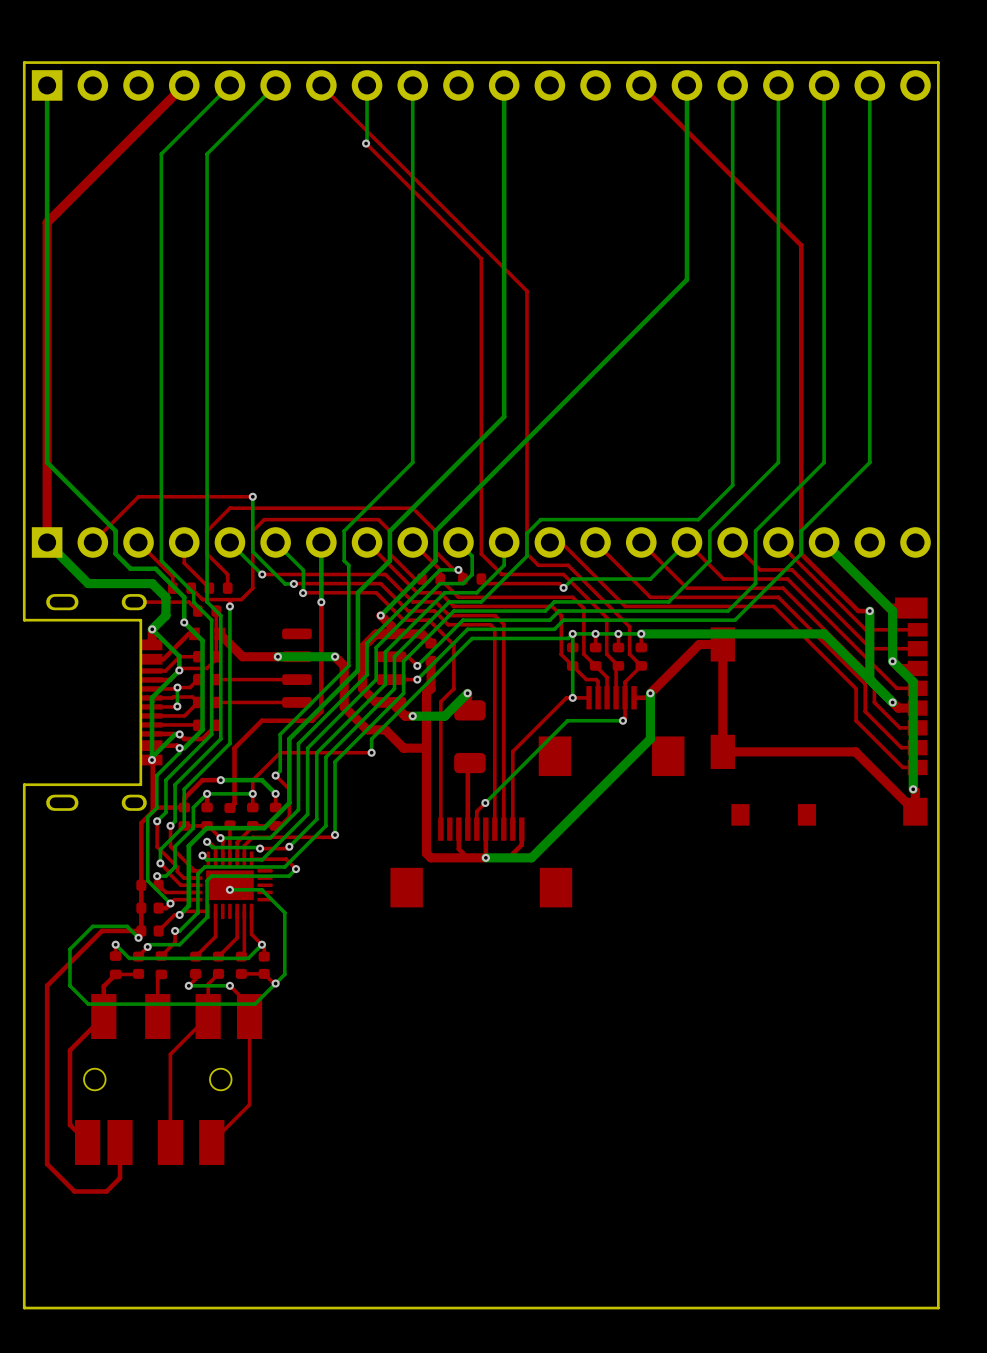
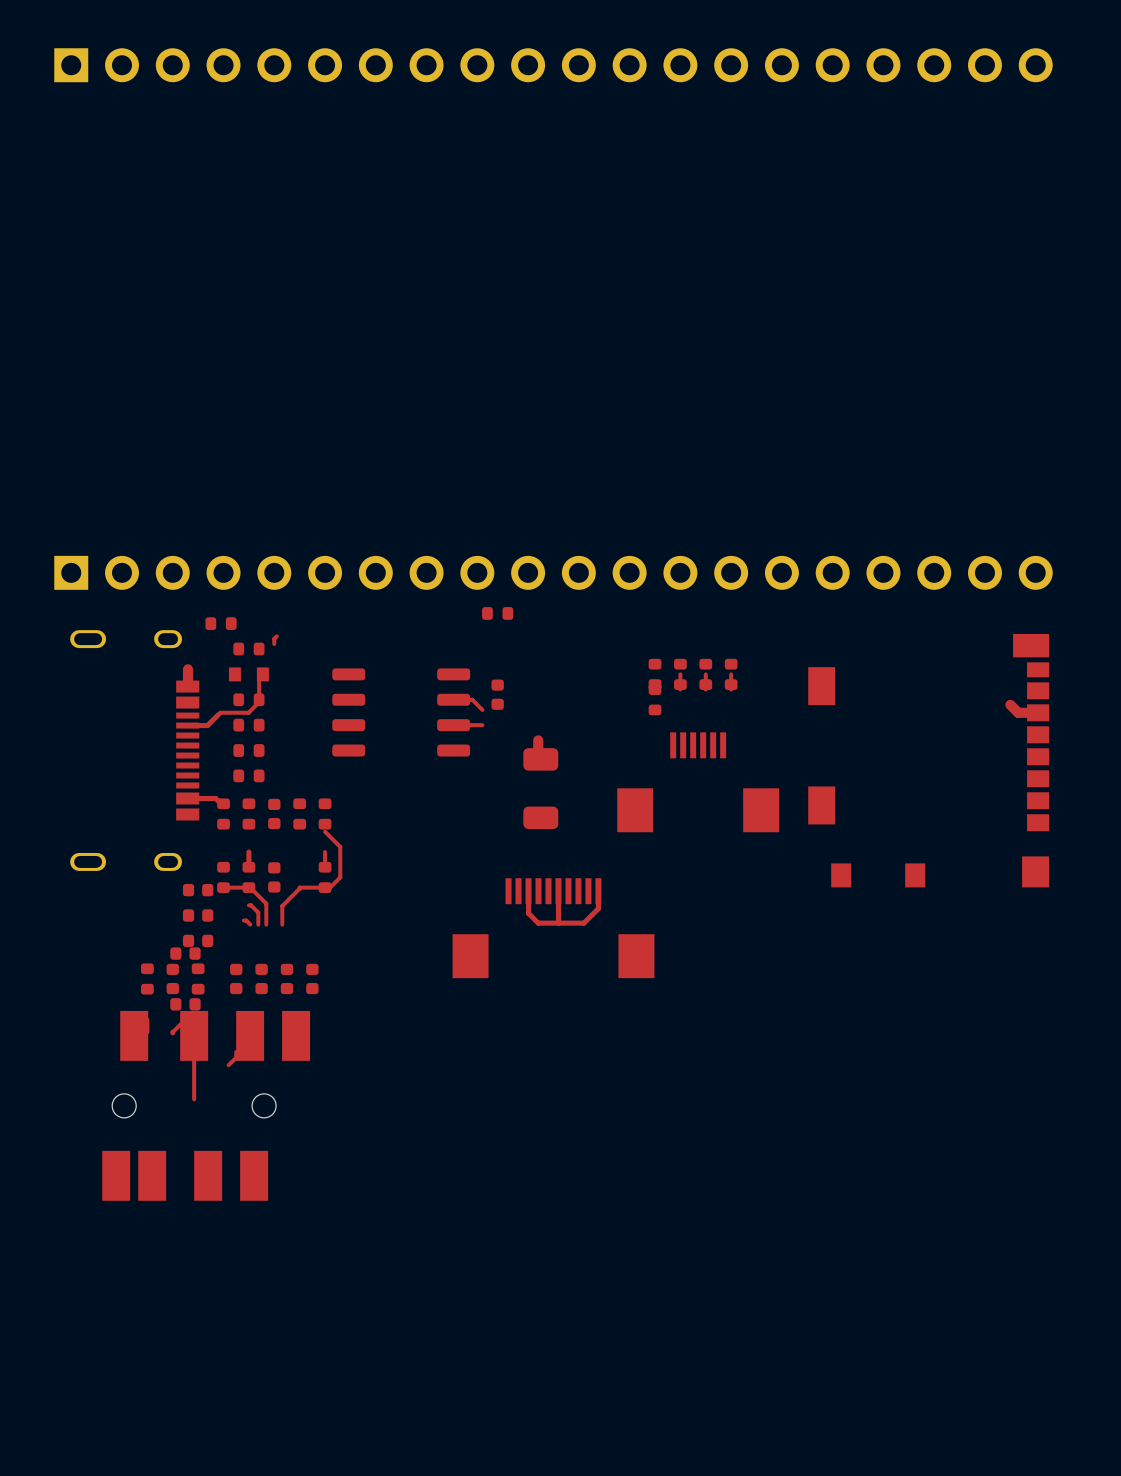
board edge: (938, 62) (24, 62) (24, 620) (140, 620) (140, 784) (24, 784) (24, 1308) (938, 1308) (938, 62) -> none
bottom track: (47, 85) (47, 462) (115, 531) (115, 553) (130, 568) (155, 568) (184, 597) (184, 622) (202, 640) (202, 729) (184, 748) (179, 748) (179, 752) (156, 775) (156, 807) (147, 817) (147, 880) (170, 903) -> none
top track: (184, 85) (47, 222) (47, 542) -> none
bottom track: (229, 85) (161, 153) (161, 560) (193, 593) (193, 602) (211, 620) (211, 734) (165, 780) (165, 812) (157, 821) -> none
bottom track: (275, 85) (207, 153) (207, 601) (220, 615) (220, 739) (175, 784) (175, 821) (170, 825) -> none
top track: (321, 85) (527, 291) (527, 553) (538, 565) (568, 565) (629, 626) (629, 654) (641, 665) (625, 682) (625, 718) (623, 720) -> none
bottom track: (367, 85) (366, 143) -> none
bottom track: (412, 85) (412, 462) (344, 531) (344, 560) (348, 565) (348, 665) (280, 734) (280, 771) (275, 775) -> none
bottom track: (504, 85) (504, 416) (389, 531) (389, 560) (357, 592) (357, 670) (289, 739) (289, 803) (264, 828) (206, 828) (188, 846) (188, 905) (179, 914) -> none
top track: (641, 85) (801, 245) (801, 553) (858, 611) (869, 611) -> none
bottom track: (686, 85) (686, 279) (435, 531) (435, 560) (380, 615) -> none
bottom track: (732, 85) (732, 485) (698, 519) (540, 519) (527, 533) (527, 556) (481, 601) (449, 601) (394, 656) (394, 688) (325, 757) (325, 825) (284, 866) (204, 866) (197, 873) (197, 912) (179, 930) (175, 930) -> none
bottom track: (778, 85) (778, 462) (709, 531) (709, 560) (668, 601) (554, 601) (545, 611) (453, 611) (403, 661) (403, 693) (335, 761) (335, 834) -> none
bottom track: (824, 85) (824, 462) (755, 531) (755, 583) (728, 611) (559, 611) (549, 620) (463, 620) (417, 665) -> none
bottom track: (869, 85) (869, 462) (801, 531) (801, 553) (734, 620) (563, 620) (554, 629) (467, 629) (417, 679) -> none
top track: (366, 143) (481, 258) (481, 553) (501, 574) (563, 574) (606, 617) (606, 654) (618, 665) (616, 668) (616, 697) -> none
via: (366, 143) -> none
top track: (252, 496) (138, 496) (92, 542) -> none
bottom track: (252, 496) (252, 551) (285, 583) (293, 583) -> none
via: (252, 496) -> none
bottom track: (47, 542) (88, 583) (152, 583) (165, 597) (165, 615) (152, 629) (179, 656) (179, 670) (152, 697) (152, 760) -> none
top track: (138, 542) (172, 576) (172, 588) -> none
top track: (184, 542) (184, 563) (209, 588) -> none
bottom track: (229, 542) (261, 574) -> none
bottom track: (275, 542) (303, 570) (303, 593) -> none
bottom track: (321, 542) (321, 602) -> none
top track: (367, 542) (417, 592) (440, 592) (453, 606) (552, 606) (561, 615) (561, 654) (586, 679) (596, 679) (598, 681) (598, 697) -> none
top track: (412, 542) (440, 569) (440, 579) (458, 597) (572, 597) (583, 608) (583, 654) (607, 677) (607, 697) -> none
bottom track: (458, 542) (472, 556) (472, 574) (463, 583) (440, 583) (376, 647) (376, 679) (307, 748) (307, 814) (262, 859) (206, 859) (202, 855) -> none
bottom track: (504, 542) (504, 565) (476, 592) (444, 592) (385, 652) (385, 684) (316, 752) (316, 819) (289, 846) -> none
top track: (549, 542) (561, 542) (625, 606) (773, 606) (856, 688) (856, 720) (902, 767) (917, 767) -> none
top track: (595, 542) (650, 597) (778, 597) (865, 684) (865, 711) (901, 747) (917, 747) -> none
top track: (641, 542) (686, 588) (782, 588) (874, 679) (874, 702) (899, 727) (917, 727) -> none
top track: (686, 542) (723, 579) (787, 579) (896, 688) (917, 688) -> none
bottom track: (686, 542) (650, 579) (572, 579) (563, 587) -> none
top track: (732, 542) (760, 569) (792, 569) (870, 648) (917, 648) -> none
top track: (778, 542) (865, 629) (917, 629) -> none
bottom track: (824, 542) (892, 611) (892, 661) (913, 681) (913, 789) -> none
bottom track: (458, 569) (440, 569) (367, 643) (367, 675) (298, 743) (298, 809) (270, 838) (220, 838) -> none
via: (458, 569) -> none
top track: (262, 574) (385, 574) (412, 601) (435, 601) (449, 615) (495, 615) (503, 624) (503, 829) -> none
via: (262, 574) -> none
top track: (421, 579) (415, 579) (389, 553) (389, 531) (378, 519) (264, 519) (252, 531) (252, 588) (241, 599) (202, 599) (191, 588) -> none
top track: (463, 579) (463, 574) (458, 569) (453, 569) (435, 551) (435, 531) (412, 508) (229, 508) (207, 531) (207, 553) (227, 574) (227, 588) -> none
part: (472, 579) -> none
top track: (481, 579) (485, 583) (559, 583) (563, 587) -> none
top track: (293, 583) (380, 583) (408, 611) (434, 611) (448, 624) (490, 624) (494, 629) (494, 829) -> none
via: (293, 583) -> none
via: (563, 587) -> none
part: (218, 588) -> none
top track: (303, 592) (376, 592) (403, 620) (429, 620) (453, 645) (453, 688) (440, 701) (440, 829) -> none
via: (303, 593) -> none
top track: (134, 602) (189, 602) (197, 611) -> none
top track: (321, 602) (321, 711) (312, 720) (261, 720) (234, 748) (234, 803) (229, 808) (230, 805) -> none
via: (321, 602) -> none
bottom track: (229, 606) (229, 743) (184, 789) (184, 825) (160, 849) (160, 863) -> none
via: (229, 606) -> none
top track: (216, 611) (216, 630) (242, 656) (296, 656) -> none
bottom track: (869, 611) (869, 679) -> none
via: (869, 611) -> none
top track: (380, 615) (391, 626) (391, 633) -> none
via: (380, 615) -> none
top track: (184, 622) (194, 633) (188, 633) (163, 659) (152, 659) -> none
via: (184, 622) -> none
via: (152, 629) -> none
bottom track: (572, 633) (568, 638) (472, 638) (371, 739) (371, 752) -> none
bottom track: (572, 633) (824, 633) (892, 702) -> none
bottom track: (572, 633) (572, 697) -> none
part: none -> (655, 674)
via: (572, 633) -> none
part: none -> (680, 674)
via: (595, 633) -> none
part: none -> (705, 674)
via: (618, 633) -> none
part: none -> (731, 674)
via: (641, 633) -> none
top track: (431, 643) (421, 633) (376, 633) (362, 647) (362, 688) (376, 702) (391, 702) (405, 716) (412, 716) -> none
top track: (197, 656) (179, 656) (165, 670) (152, 670) -> none
via: (277, 656) -> none
top track: (335, 656) (344, 665) (344, 707) (367, 729) (385, 729) (403, 748) (426, 748) -> none
bottom track: (335, 656) (277, 656) -> none
via: (335, 656) -> none
part: (595, 656) -> none
part: (618, 656) -> none
part: (641, 656) -> none
top track: (431, 660) (431, 688) (426, 693) (426, 853) (431, 857) (485, 857) -> none
via: (892, 661) -> none
via: (417, 665) -> none
via: (179, 670) -> none
top track: (197, 679) (189, 687) (152, 688) -> none
top track: (296, 679) (216, 679) -> none
via: (417, 679) -> none
bottom track: (177, 687) (177, 706) -> none
via: (177, 687) -> none
bottom track: (467, 693) (444, 716) (412, 716) -> none
via: (467, 693) -> none
bottom track: (650, 693) (650, 739) (531, 857) (485, 857) -> none
via: (650, 693) -> none
top track: (152, 697) (192, 697) (197, 702) (184, 715) (152, 715) -> none
via: (572, 697) -> none
top track: (588, 697) (566, 697) (512, 751) (512, 829) -> none
top track: (634, 697) (645, 697) (699, 644) (722, 644) (722, 751) (855, 751) (915, 811) (915, 791) (913, 789) -> none
top track: (296, 702) (216, 702) -> none
top track: (892, 702) (898, 708) (917, 708) -> none
via: (892, 702) -> none
top track: (177, 706) (152, 706) -> none
via: (177, 706) -> none
via: (412, 716) -> none
bottom track: (623, 720) (567, 720) (485, 803) -> none
via: (623, 720) -> none
top track: (152, 724) (197, 725) -> none
top track: (216, 725) (202, 739) (184, 739) (179, 733) (152, 733) -> none
bottom track: (179, 734) (175, 734) (152, 757) -> none
via: (179, 734) -> none
via: (179, 748) -> none
top track: (371, 752) (280, 752) (252, 780) (252, 807) -> none
via: (371, 752) -> none
part: none -> (223, 813)
part: none -> (248, 813)
part: none -> (274, 813)
part: none -> (299, 813)
part: none -> (325, 813)
top track: (152, 760) (152, 811) -> none
via: (152, 760) -> none
top track: (469, 763) (467, 765) (467, 829) -> none
via: (275, 775) -> none
top track: (220, 780) (202, 780) (184, 798) (184, 807) (156, 807) (141, 823) (141, 935) (138, 937) -> none
bottom track: (220, 780) (261, 780) (275, 793) -> none
via: (220, 780) -> none
via: (913, 789) -> none
via: (207, 793) -> none
bottom track: (252, 793) (207, 793) (193, 807) (193, 828) (175, 846) (175, 866) (165, 876) (157, 876) -> none
via: (252, 793) -> none
via: (275, 793) -> none
top track: (485, 803) (476, 811) (476, 829) -> none
via: (485, 803) -> none
part: (252, 816) -> none
top track: (157, 821) (157, 846) (177, 866) (177, 871) (183, 878) (194, 878) -> none
via: (157, 821) -> none
top track: (170, 825) (170, 846) (194, 870) -> none
via: (170, 825) -> none
top track: (229, 825) (229, 859) -> none
part: none -> (198, 890)
top track: (335, 834) (332, 837) (252, 837) (244, 845) (244, 859) -> none
via: (335, 834) -> none
via: (220, 838) -> none
bottom track: (207, 841) (212, 847) (260, 848) -> none
via: (207, 841) -> none
top track: (289, 846) (287, 848) (260, 848) -> none
via: (289, 846) -> none
via: (260, 848) -> none
part: none -> (198, 915)
via: (202, 855) -> none
via: (485, 857) -> none
top track: (251, 859) (286, 859) (296, 869) -> none
top track: (160, 863) (180, 885) (194, 885) -> none
via: (160, 863) -> none
bottom track: (296, 869) (289, 876) (211, 876) (207, 880) (207, 917) (179, 944) (149, 944) (147, 946) -> none
via: (296, 869) -> none
part: none -> (198, 940)
top track: (157, 876) (158, 885) (165, 892) (194, 892) -> none
via: (157, 876) -> none
part: (229, 885) -> none
bottom track: (229, 889) (261, 889) (284, 912) (284, 974) (255, 1004) (88, 1004) (69, 985) (69, 949) (92, 926) (127, 926) (138, 937) -> none
via: (229, 889) -> none
top track: (194, 899) (174, 899) (165, 908) (158, 908) -> none
via: (170, 903) -> none
part: none -> (147, 978)
part rotation: 0° (149, 908) -> 90° clockwise (172, 978)
part: none -> (198, 978)
part: none -> (236, 978)
part: none -> (261, 978)
part: none -> (286, 978)
part: none -> (312, 978)
top track: (208, 911) (183, 911) (179, 914) (174, 914) (158, 930) -> none
top track: (215, 911) (215, 936) (195, 956) -> none
top track: (237, 911) (237, 937) (218, 956) -> none
top track: (244, 911) (244, 953) (241, 956) -> none
top track: (251, 911) (251, 934) (264, 946) (264, 956) -> none
via: (179, 914) -> none
top track: (141, 930) (101, 930) (47, 985) (47, 1164) (74, 1191) (106, 1191) (120, 1178) (120, 1142) -> none
top track: (175, 930) (175, 942) (161, 956) -> none
via: (175, 930) -> none
via: (138, 937) -> none
via: (115, 944) -> none
bottom track: (261, 944) (248, 958) (129, 958) (115, 944) -> none
via: (261, 944) -> none
via: (147, 946) -> none
part: (115, 965) -> none
part: (138, 965) -> none
part: (161, 965) -> none
part: (195, 965) -> none
part: (218, 965) -> none
part: (241, 965) -> none
part: (264, 965) -> none
top track: (138, 973) (115, 974) (103, 986) (103, 1016) (69, 1050) (69, 1124) (87, 1142) -> none
top track: (218, 973) (208, 984) (208, 1016) (170, 1054) (170, 1142) -> none
top track: (241, 973) (264, 973) (275, 983) -> none
via: (275, 983) -> none
via: (188, 985) -> none
top track: (229, 985) (249, 1005) (249, 1104) (211, 1142) -> none
bottom track: (229, 985) (188, 985) -> none
via: (229, 985) -> none
part position: (168, 1079) -> (206, 1105)

